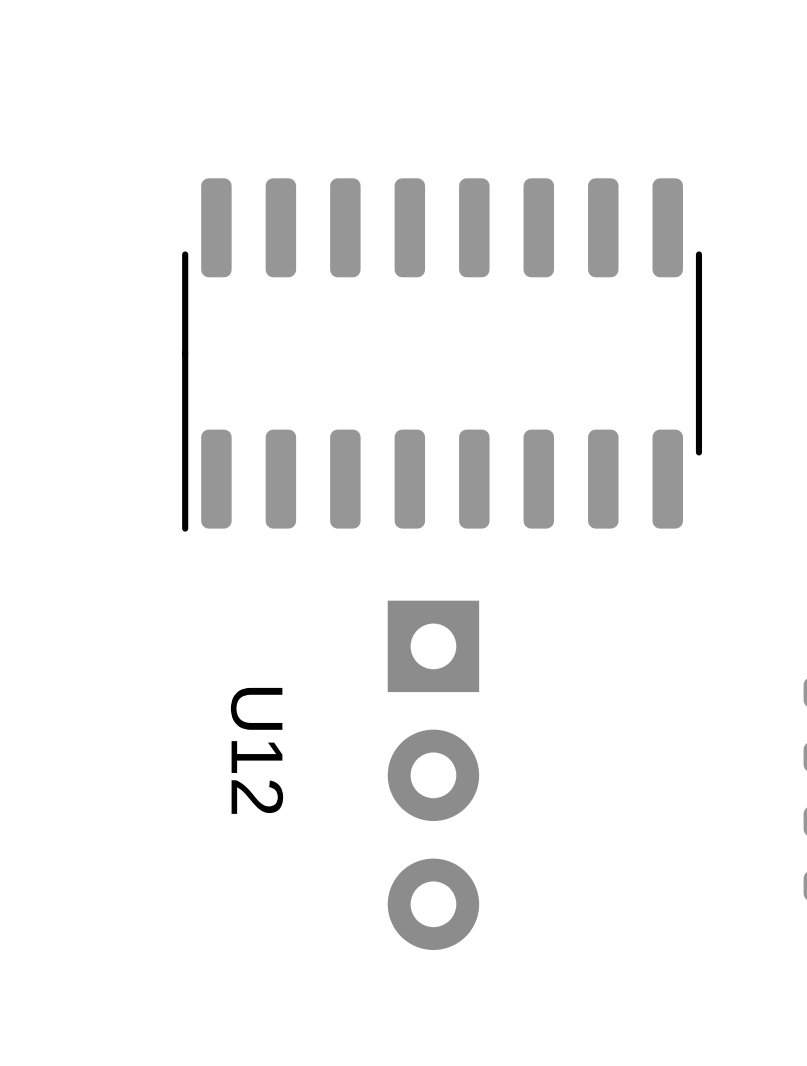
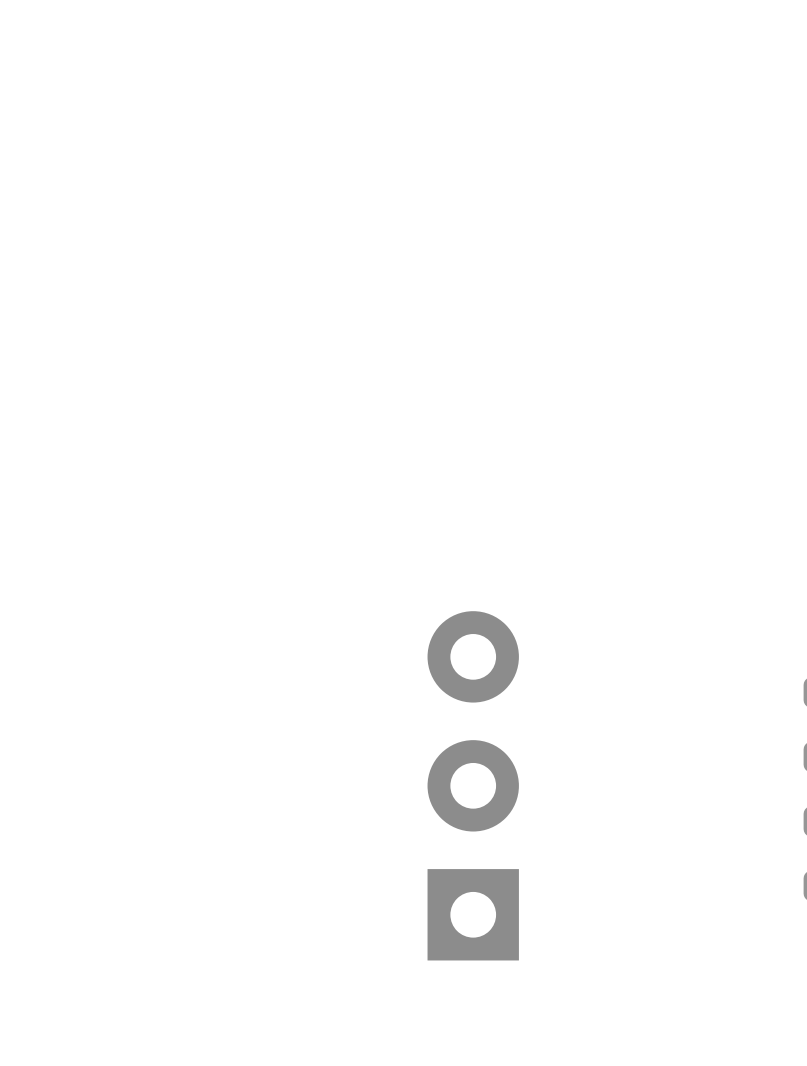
U12: (442, 354) -> none
part rotation: 0° (433, 775) -> 180° (473, 785)

